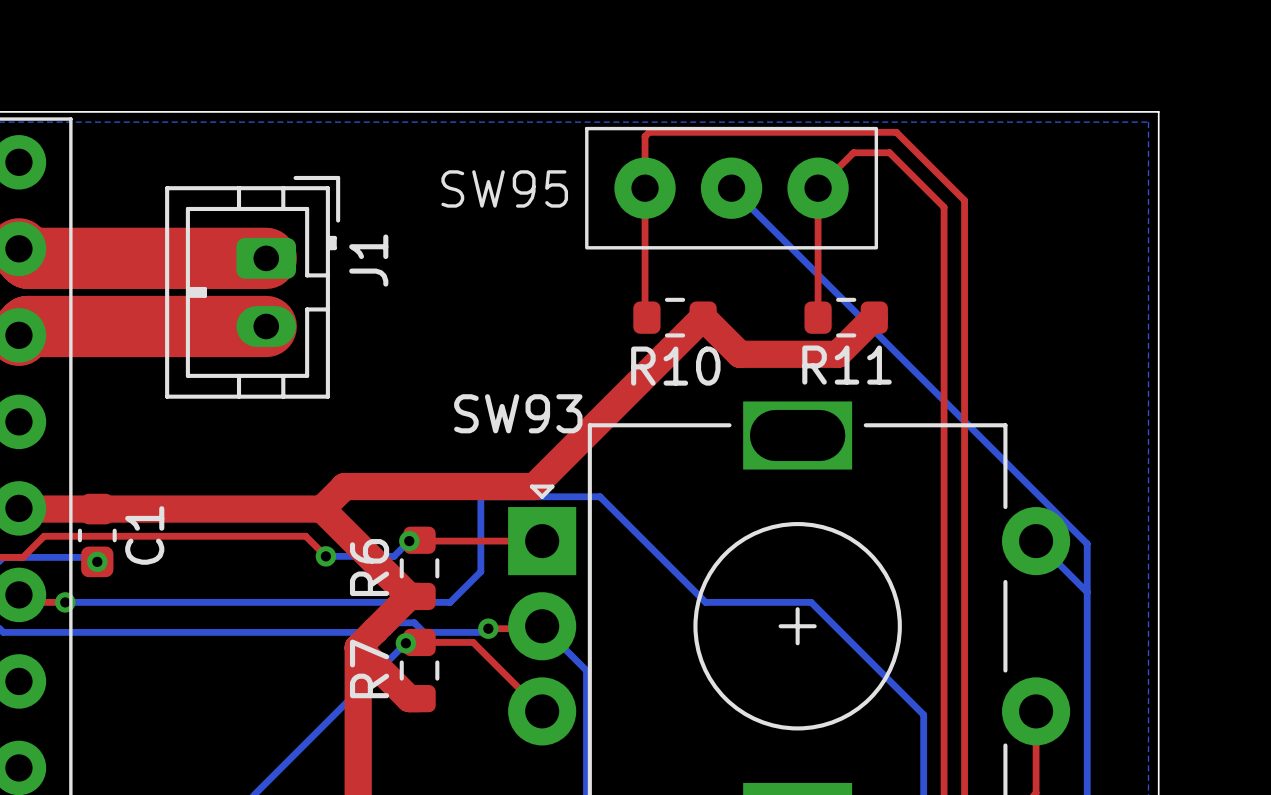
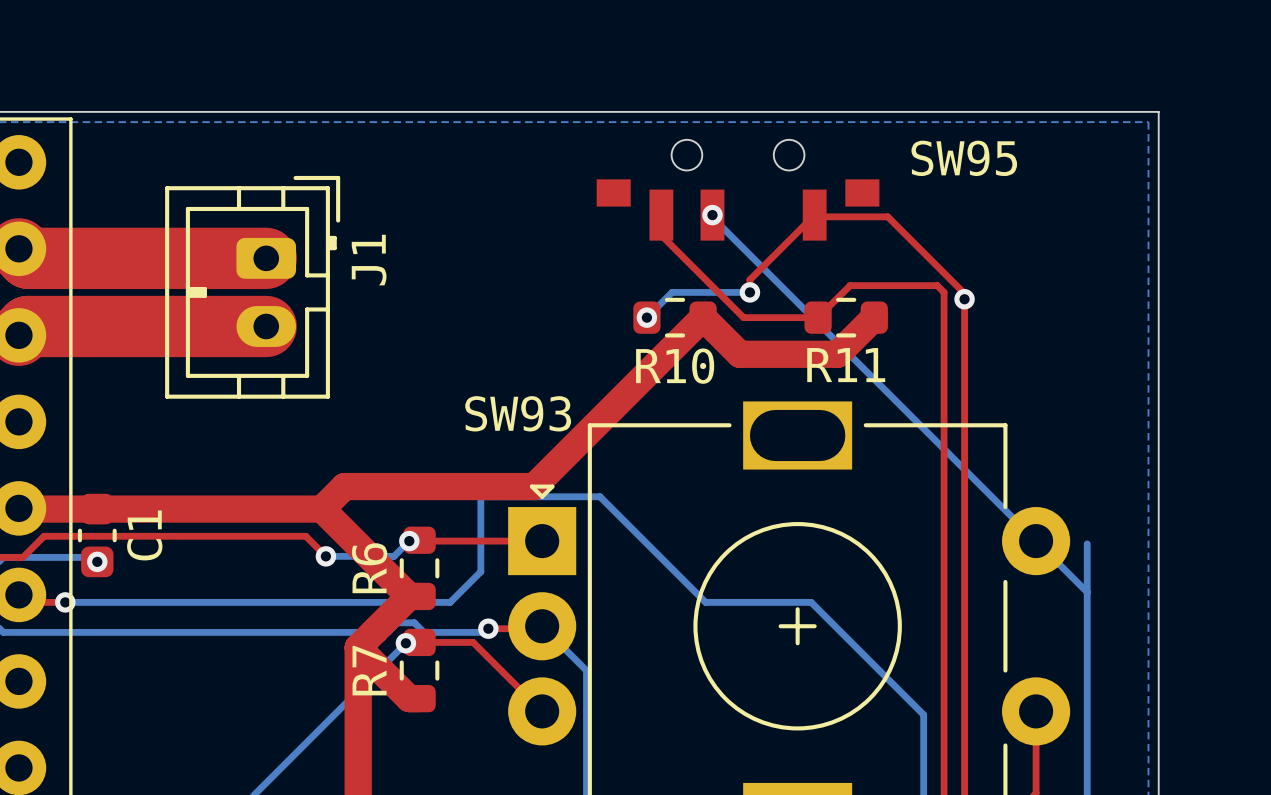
SW95 footprint: [585, 126, 879, 250] -> [596, 139, 880, 241]
SW95 name position: SW95 (504, 188) -> SW95 (964, 158)
bottom track: (731, 188) (1087, 543) -> none
bottom track: none -> (712, 215) (712, 217) (1036, 541)
via: none -> (712, 215)
bottom track: none -> (749, 292) (672, 292) (646, 317)
via: none -> (749, 292)
top track: (944, 292) (944, 207) (889, 152) (853, 152) (818, 188) (818, 317) -> (944, 292) (937, 285) (850, 285) (818, 317) (743, 317) (661, 235) (661, 215)
top track: (964, 293) (964, 200) (896, 132) (649, 132) (645, 136) (645, 315) -> (964, 293) (887, 216) (816, 216) (814, 215) (749, 279) (749, 292)
via: none -> (964, 299)
via: none -> (646, 317)

